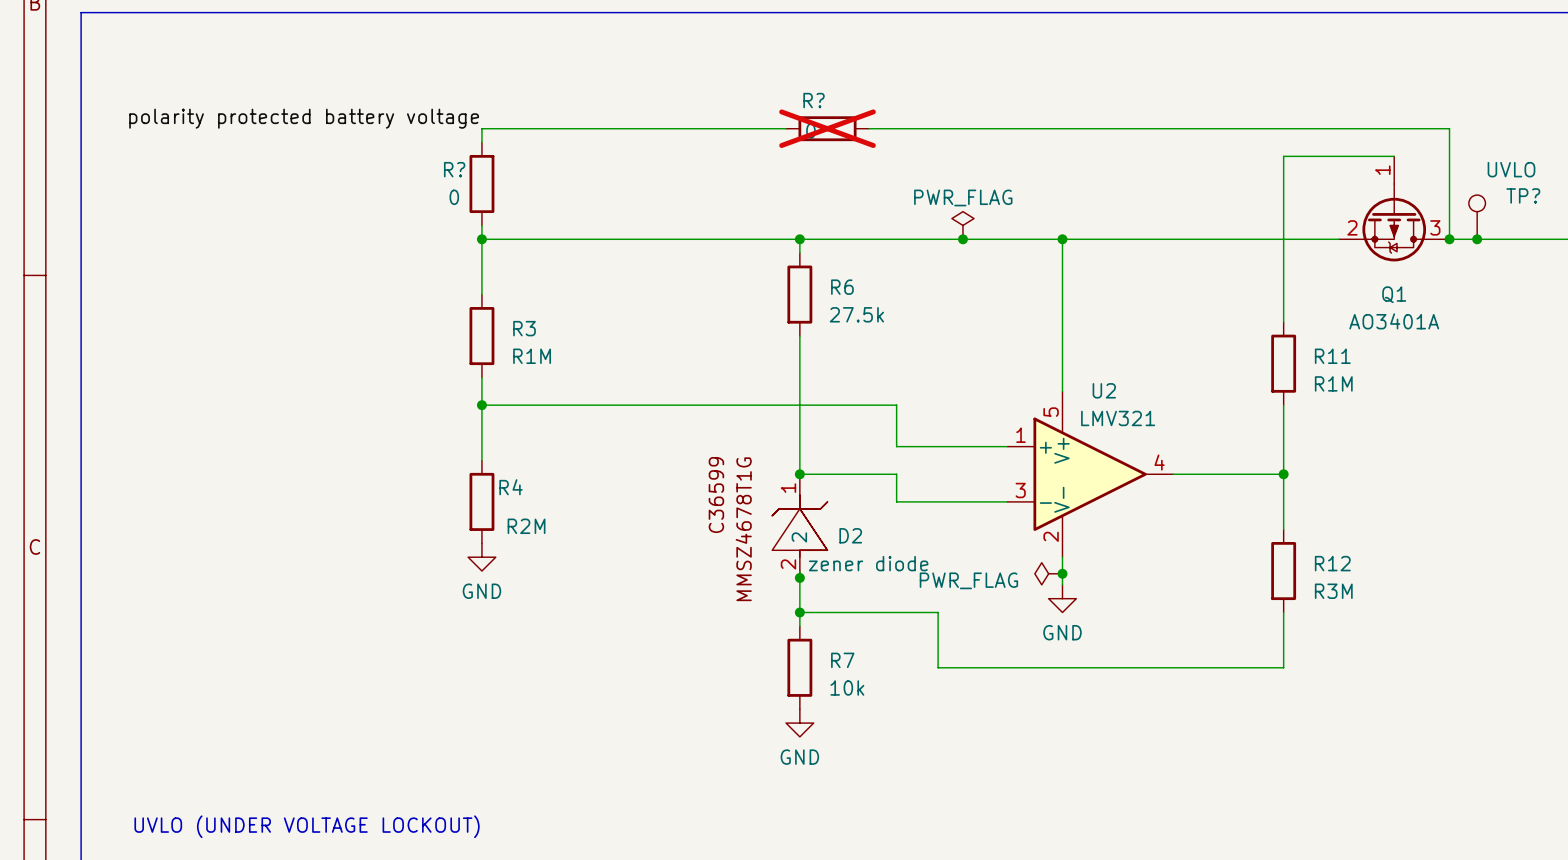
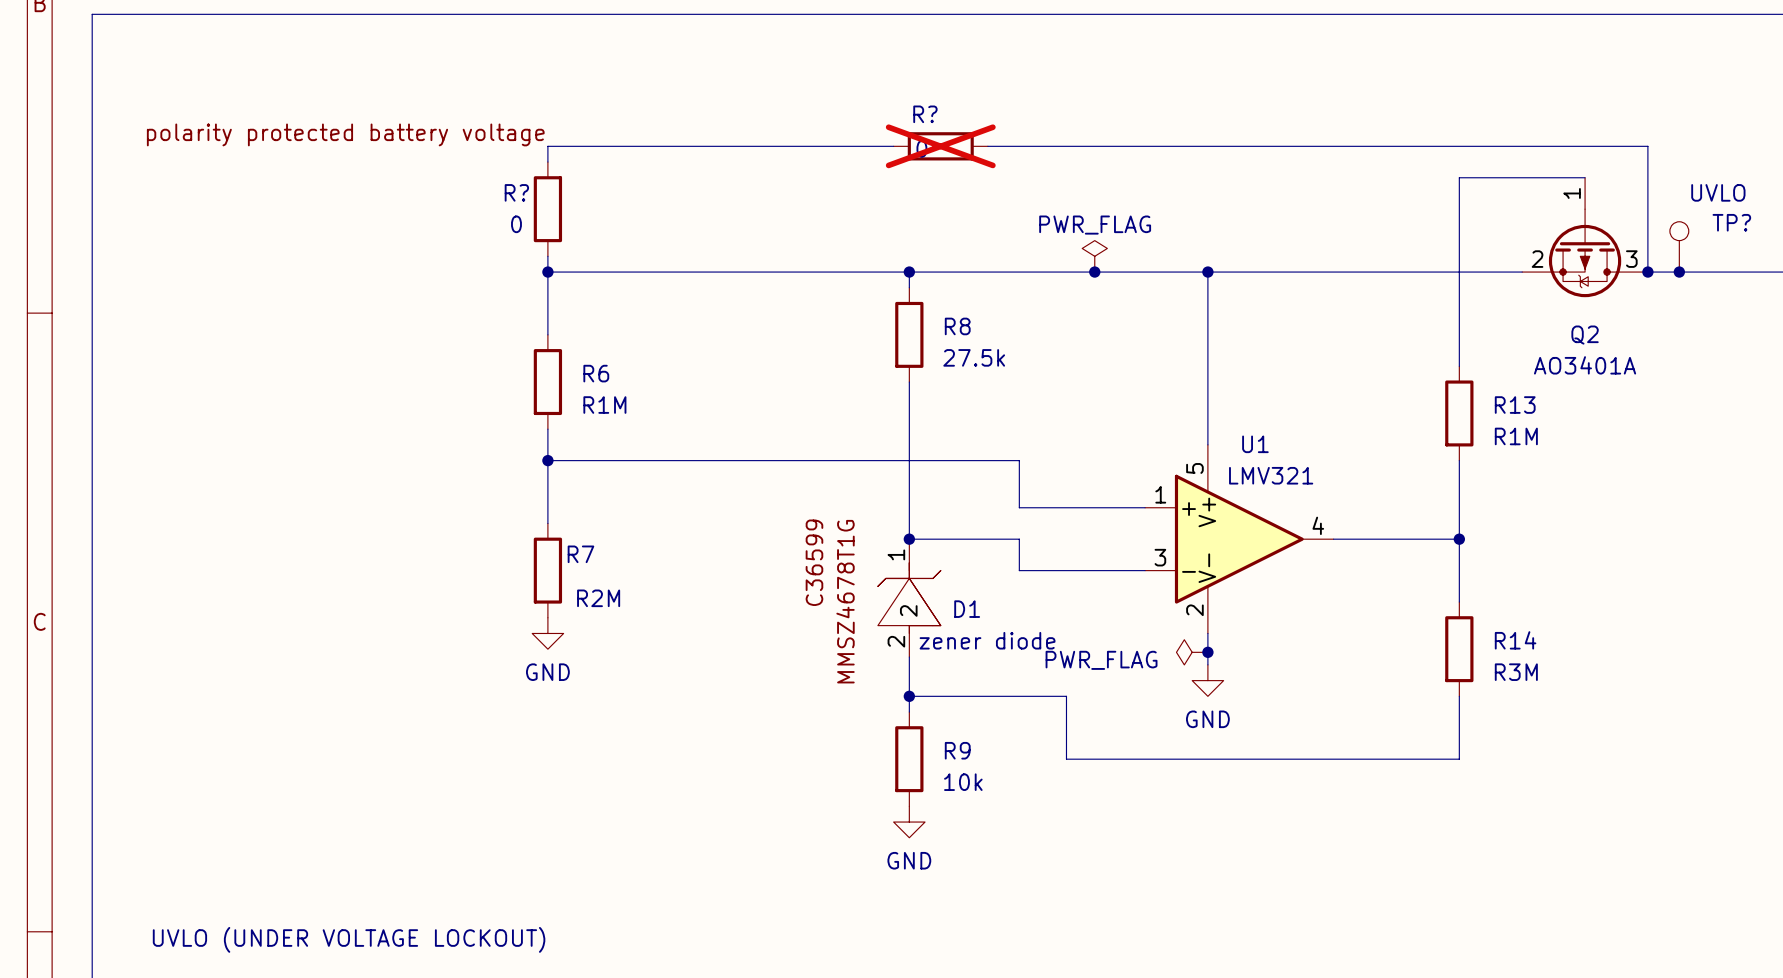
R6 name: R6 (842, 287) -> R8 (957, 326)
Q1 name: Q1 (1394, 294) -> Q2 (1585, 335)
R3 name: R3 (524, 328) -> R6 (596, 373)
R11 name: R11 (1332, 356) -> R13 (1515, 405)
U2 name: U2 (1104, 390) -> U1 (1255, 444)
R4 name: R4 (511, 487) -> R7 (580, 554)
D2 name: D2 (850, 535) -> D1 (967, 609)
R12 name: R12 (1332, 563) -> R14 (1515, 640)
junction: (799, 577) -> none
R7 name: R7 (842, 660) -> R9 (957, 750)

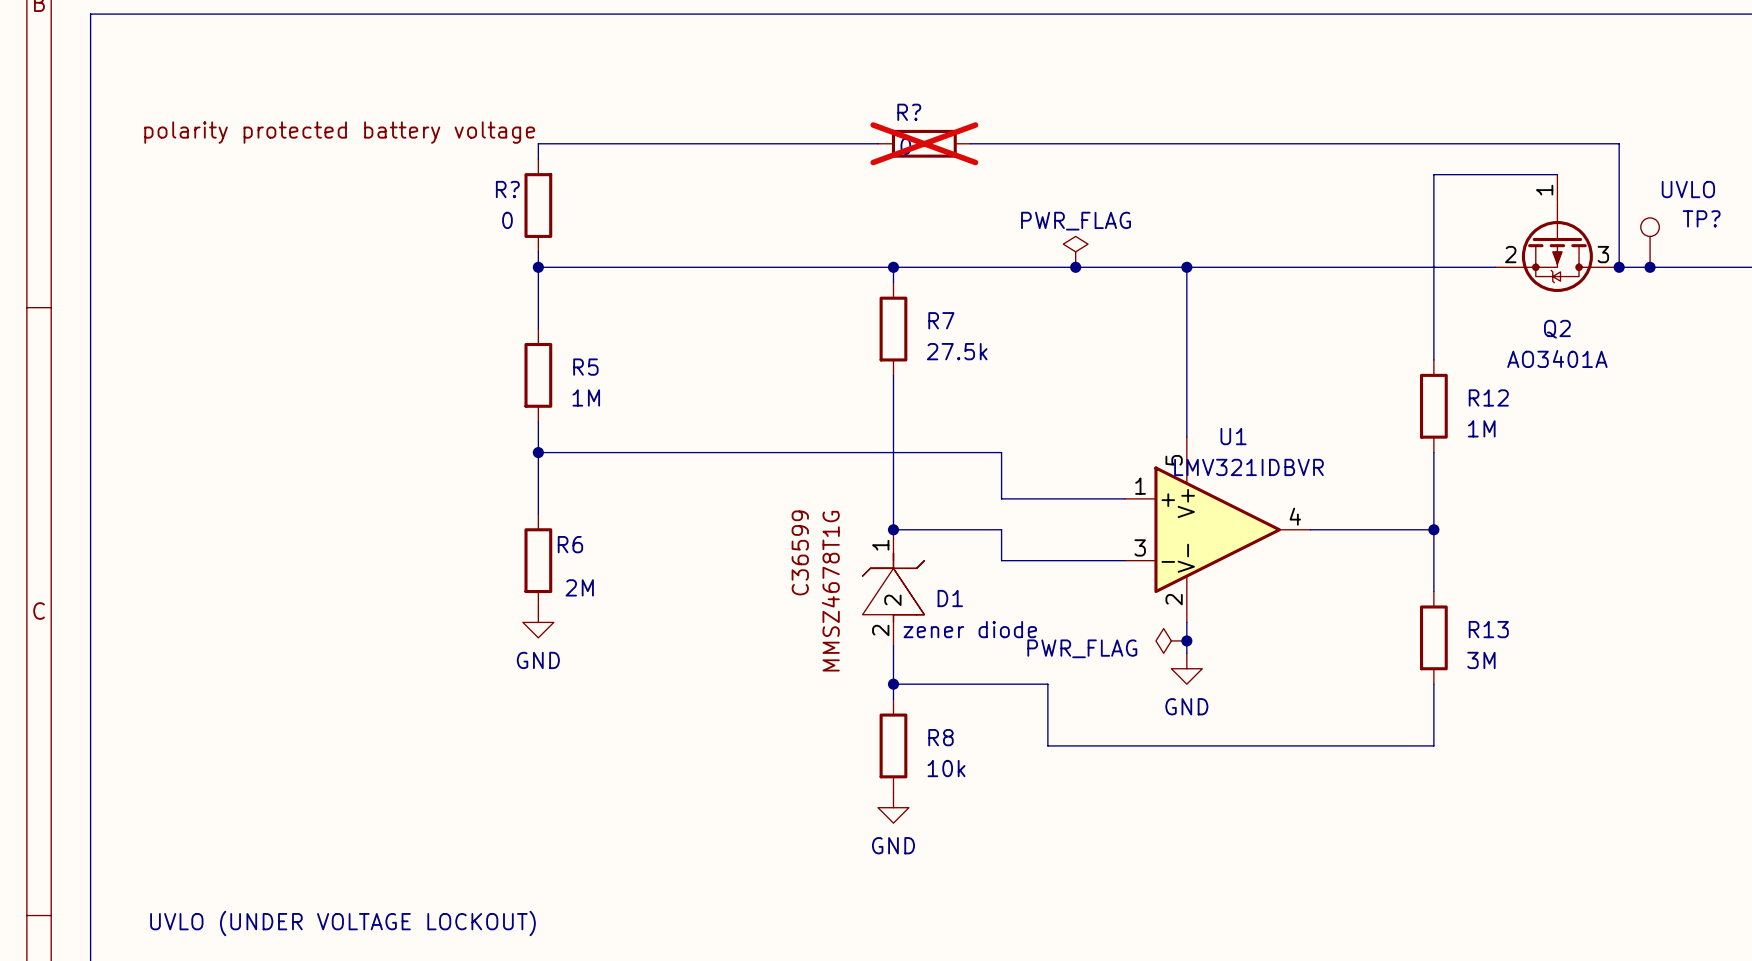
R8 name: R8 (957, 326) -> R7 (941, 320)
R6 name: R6 (596, 373) -> R5 (585, 367)
R6 value: R1M (604, 405) -> 1M (586, 397)
R13 name: R13 (1515, 405) -> R12 (1488, 397)
R13 value: R1M (1516, 436) -> 1M (1481, 428)
U1 value: LMV321 (1271, 475) -> LMV321IDBVR (1248, 467)
R7 name: R7 (580, 554) -> R6 (570, 544)
R7 value: R2M (598, 598) -> 2M (579, 587)
R14 name: R14 (1515, 640) -> R13 (1488, 629)
R14 value: R3M (1516, 672) -> 3M (1481, 660)
R9 name: R9 (957, 750) -> R8 (941, 737)

